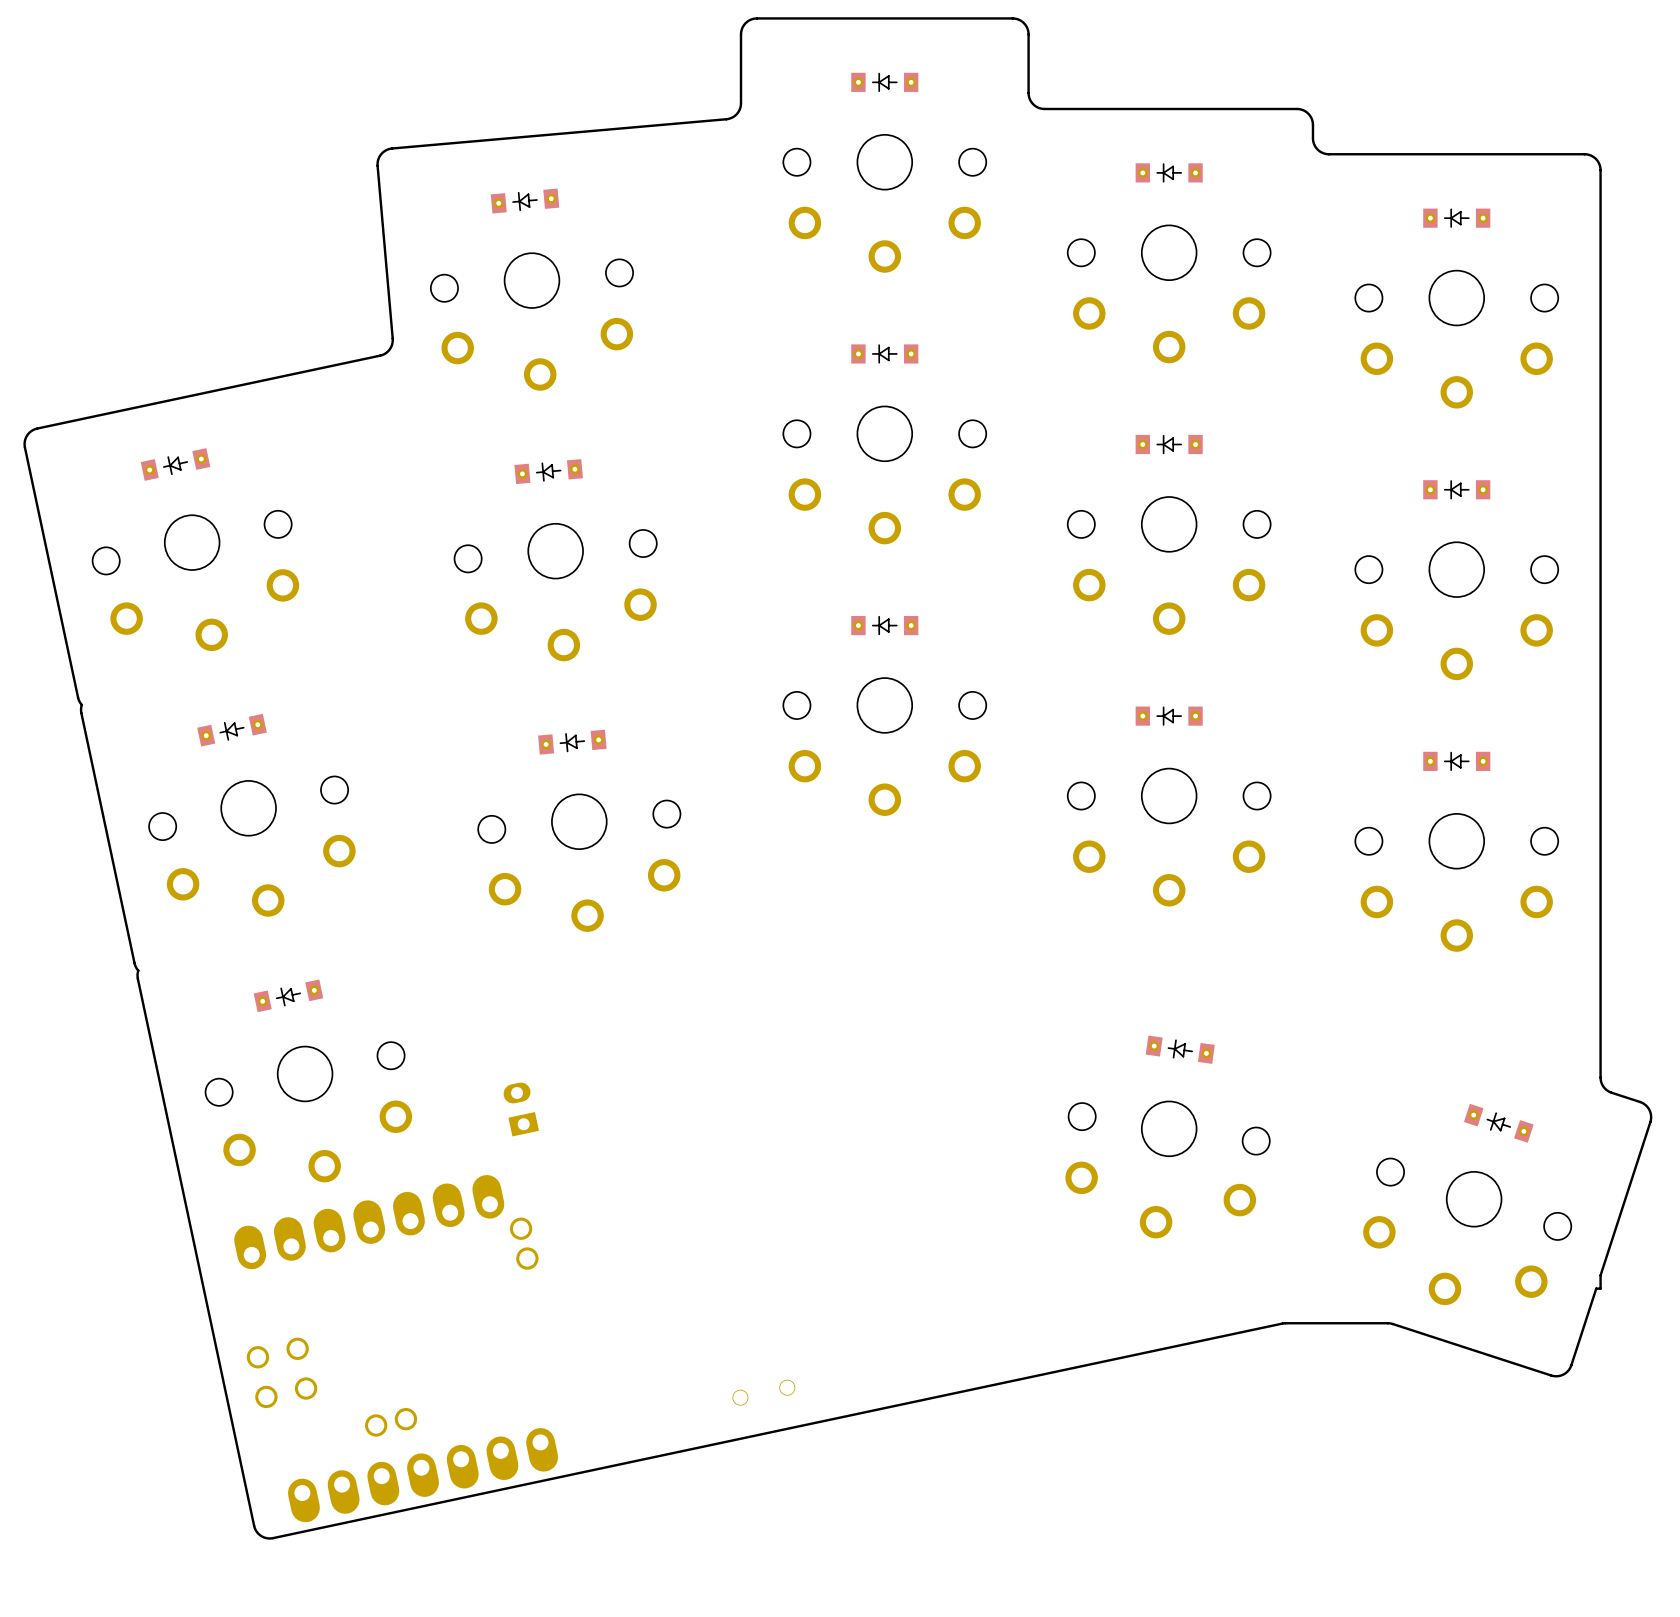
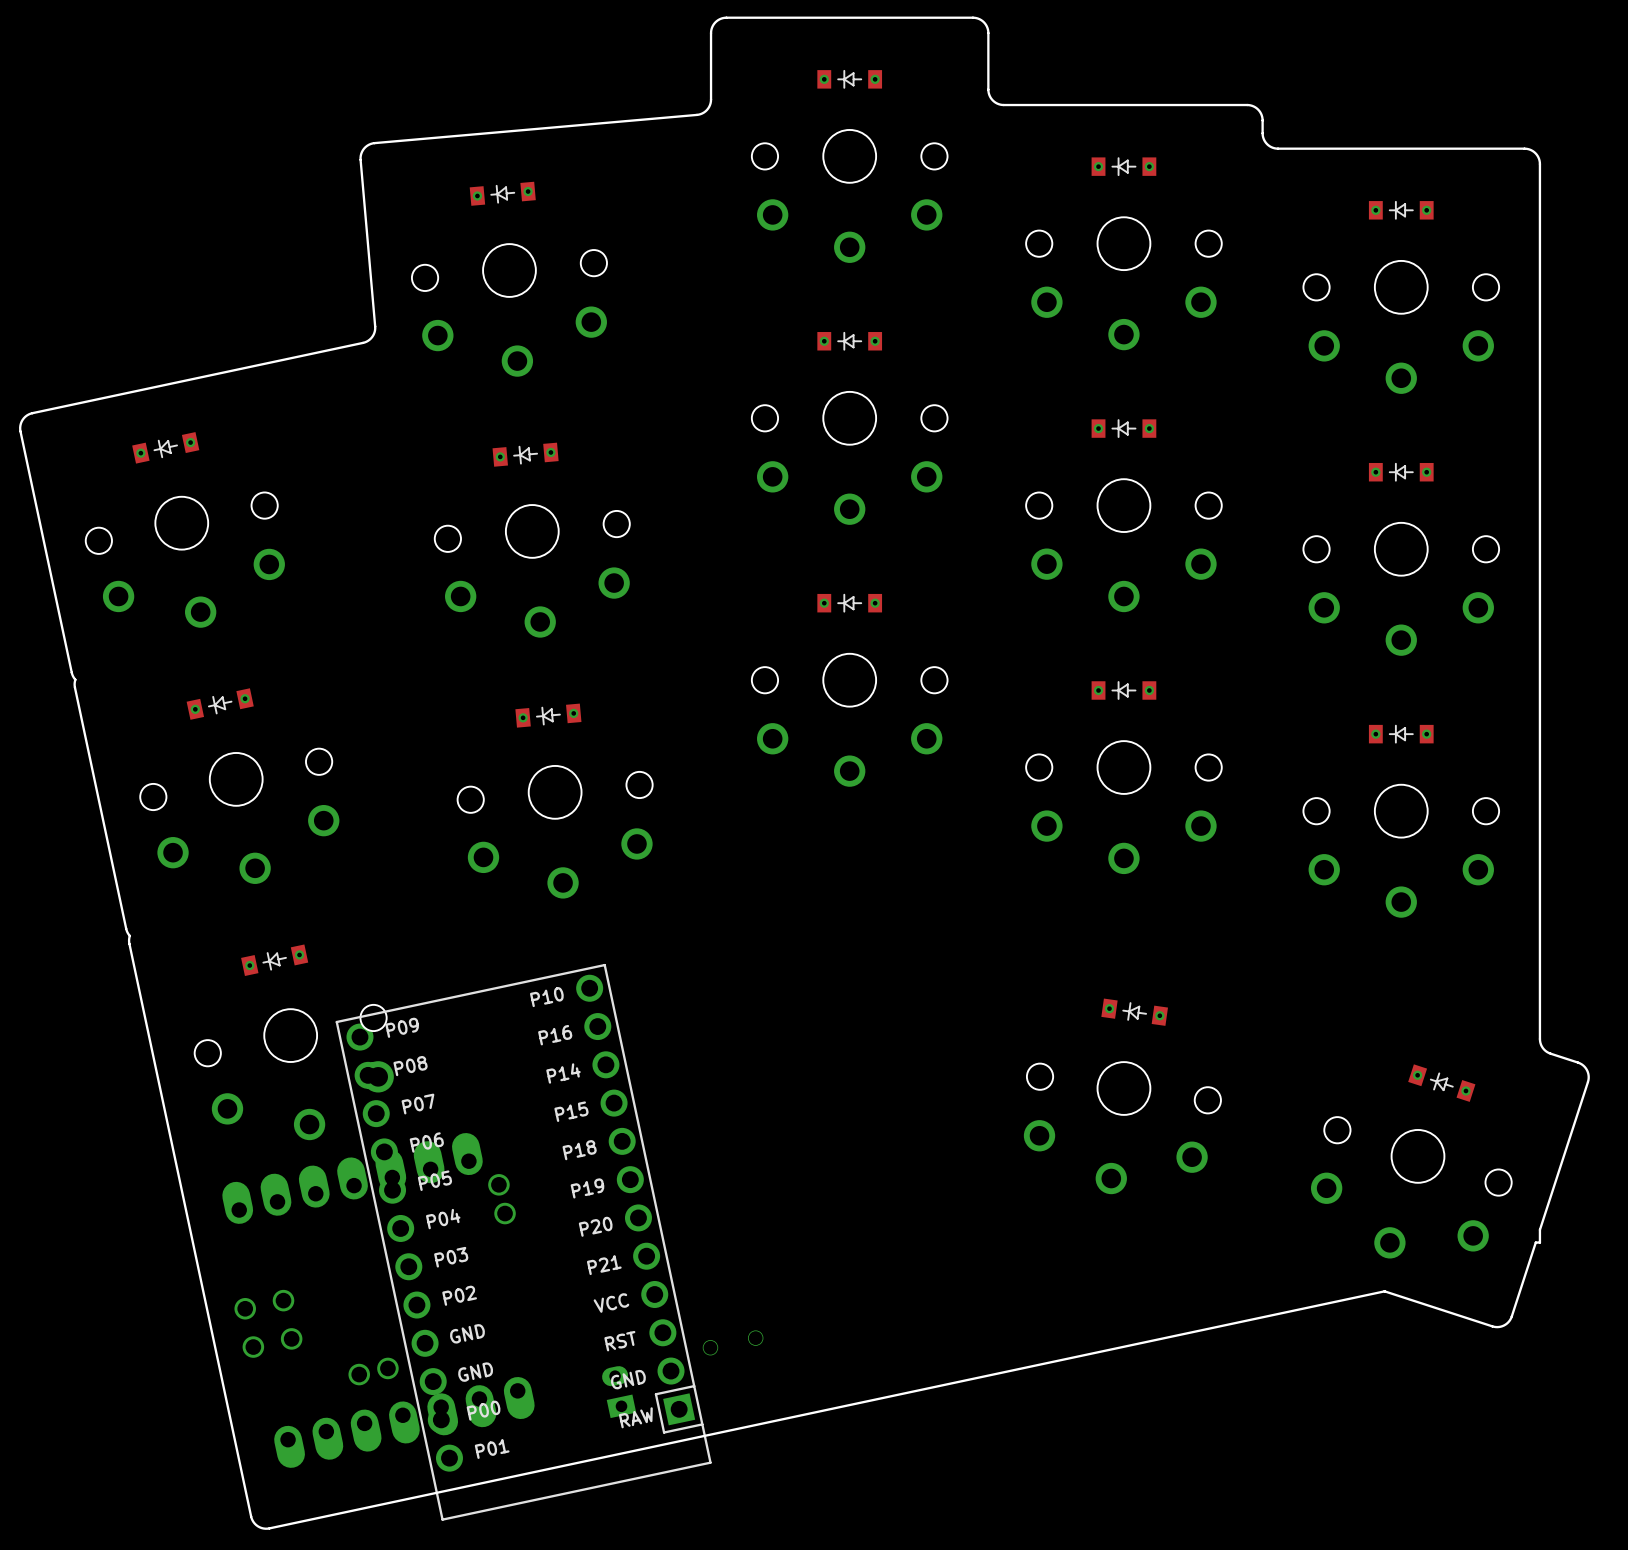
part position: (521, 1109) -> (619, 1392)
part: none -> (523, 1242)
board edge: (1439, 1339) (1389, 1323) (1284, 1323) (273, 1538) (261, 1535) (254, 1525) -> (1384, 1291) (269, 1528) (259, 1527) (252, 1520) (241, 1471)

